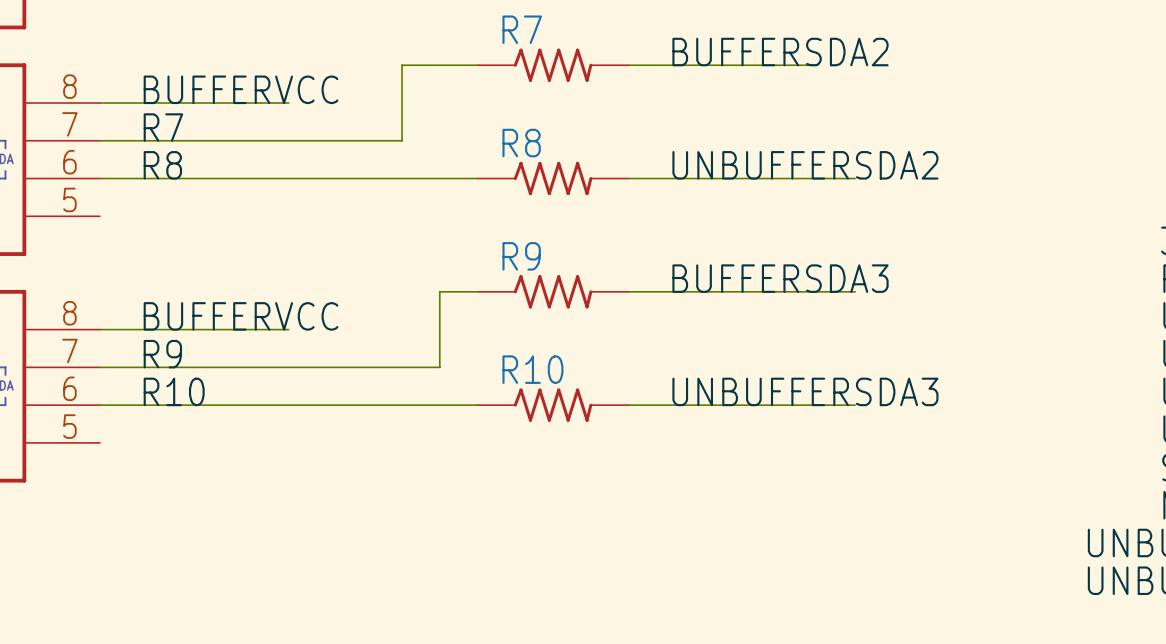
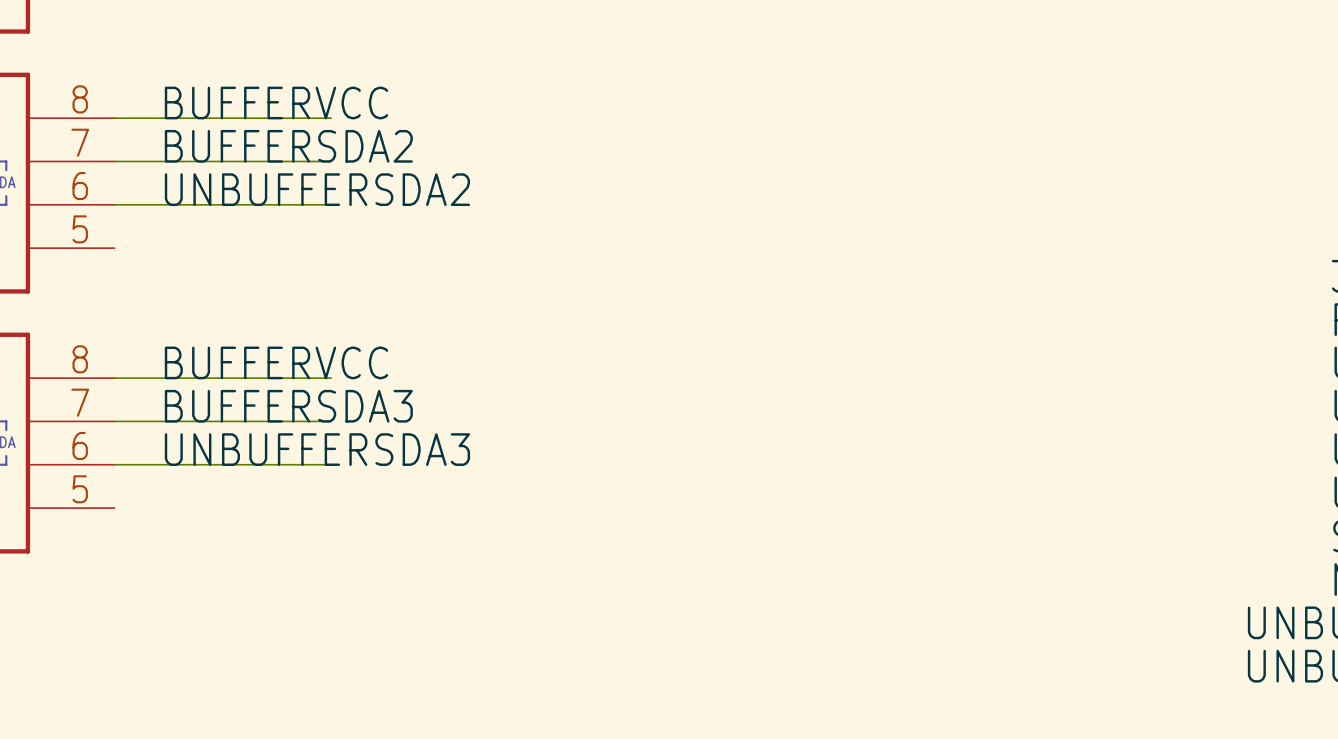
label: BUFFERSDA2 (780, 52) -> none
wire: (477, 65) (402, 65) (402, 140) (288, 140) -> none
R7: (553, 65) -> none
wire: (628, 65) (817, 65) -> none
label: R7 (163, 127) -> BUFFERSDA2 (288, 146)
label: R8 (162, 165) -> UNBUFFERSDA2 (317, 189)
label: UNBUFFERSDA2 (805, 165) -> none
wire: (288, 178) (477, 178) -> none
R8: (553, 178) -> none
wire: (628, 178) (855, 178) -> none
label: BUFFERSDA3 (780, 278) -> none
wire: (477, 291) (439, 291) (439, 367) (288, 367) -> none
R9: (553, 291) -> none
wire: (628, 291) (855, 291) -> none
label: R9 (162, 354) -> BUFFERSDA3 (288, 406)
label: R10 (174, 391) -> UNBUFFERSDA3 (317, 449)
label: UNBUFFERSDA3 (805, 391) -> none
wire: (288, 405) (477, 405) -> none
R10: (553, 405) -> none
wire: (628, 405) (855, 405) -> none

